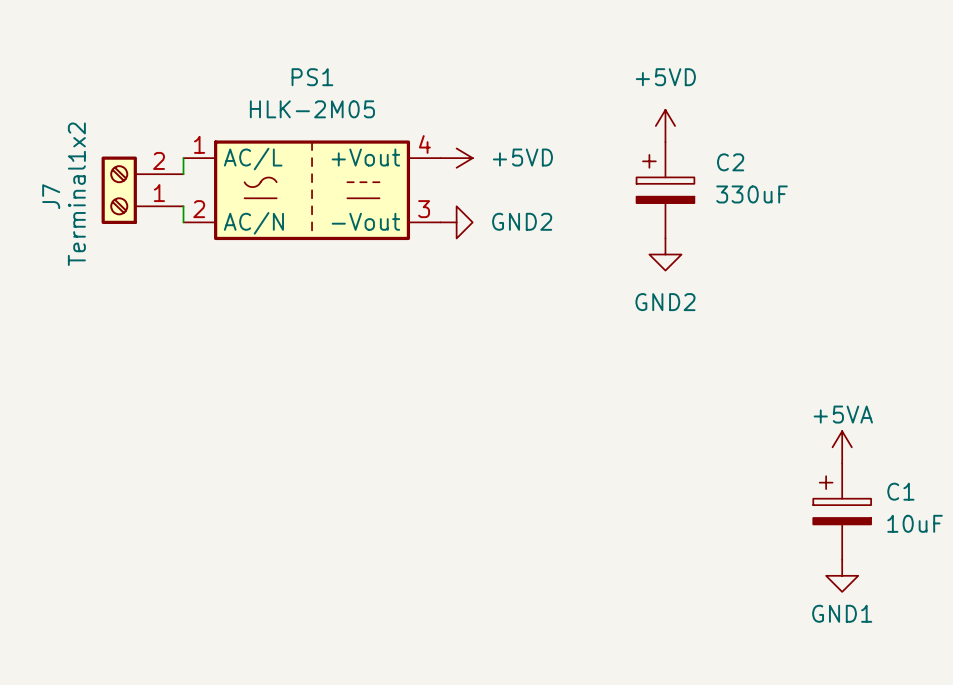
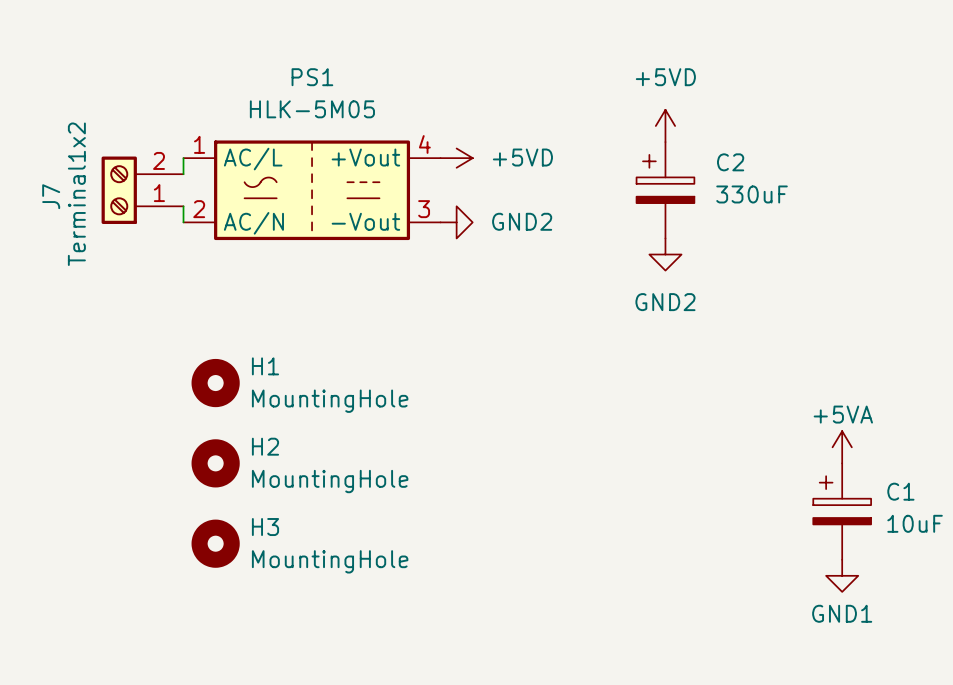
PS1 value: HLK-2M05 (312, 109) -> HLK-5M05 (312, 109)
H1: none -> MountingHole (215, 383)
H2: none -> MountingHole (215, 463)
H3: none -> MountingHole (215, 543)

